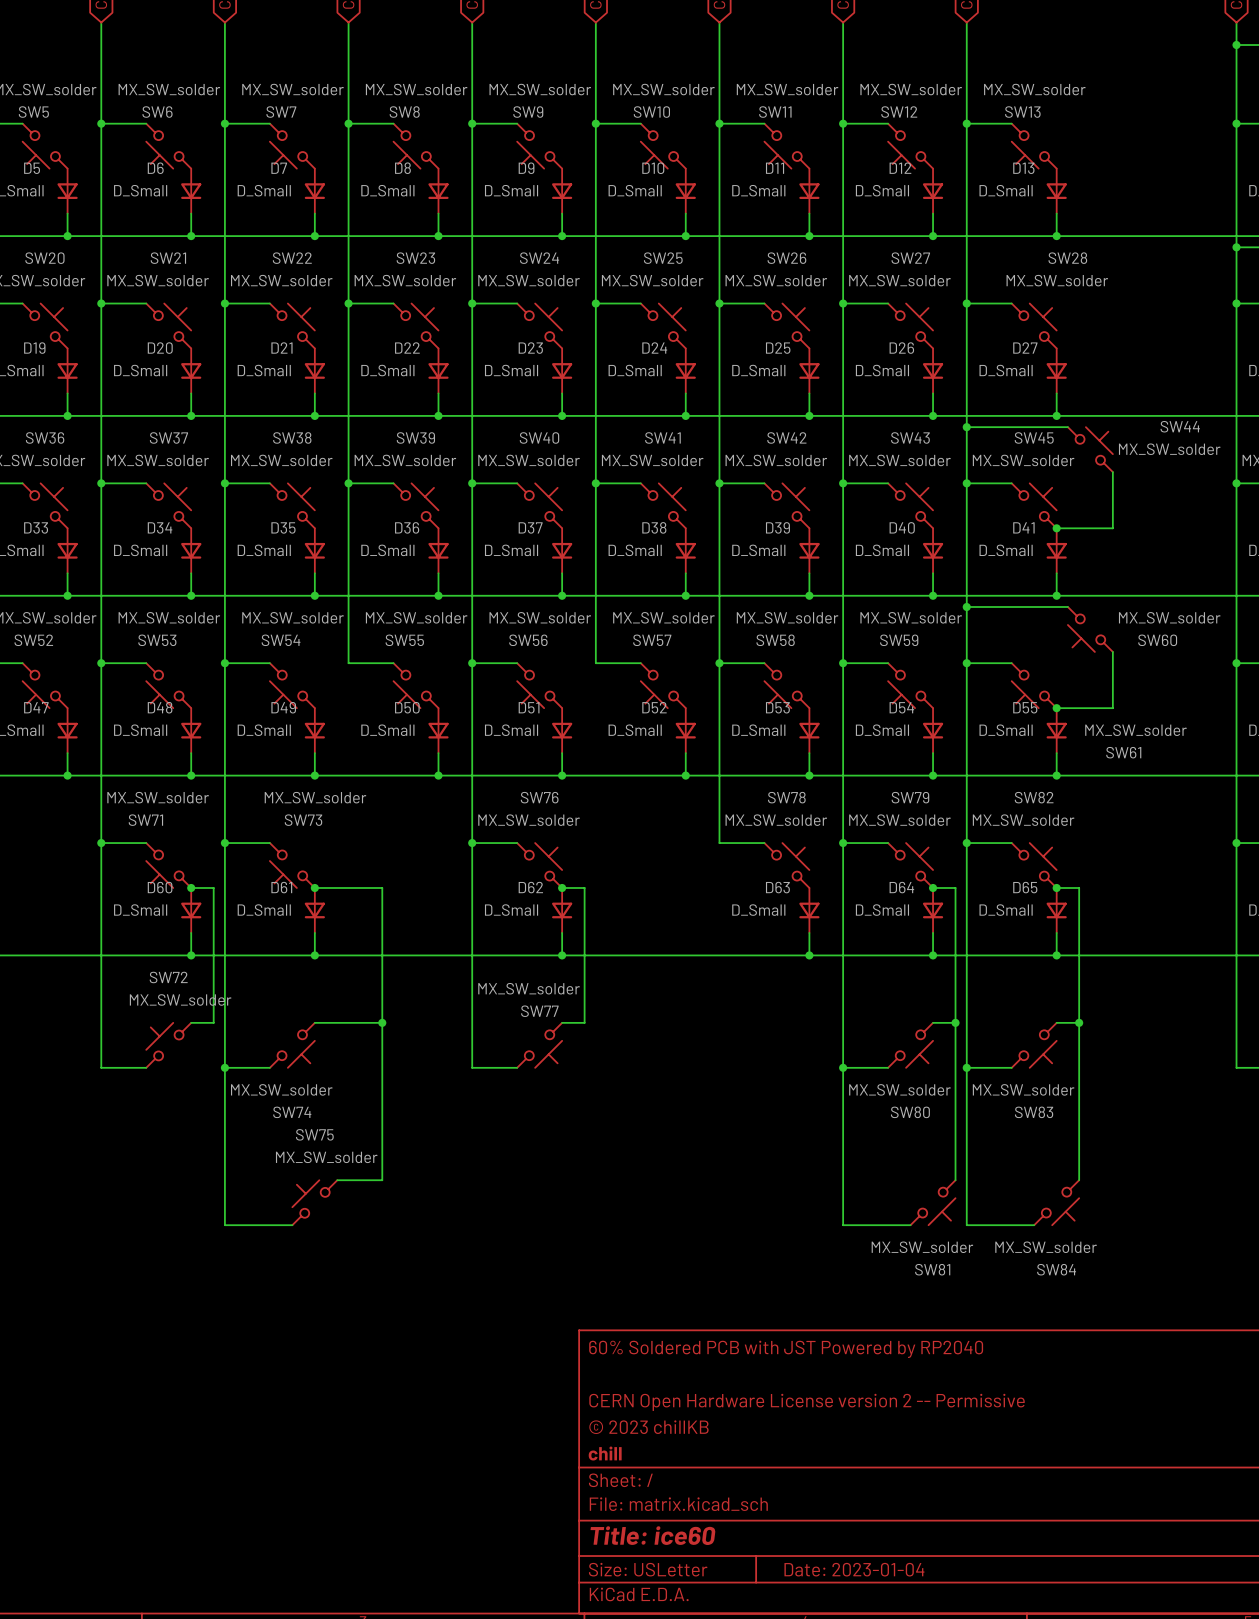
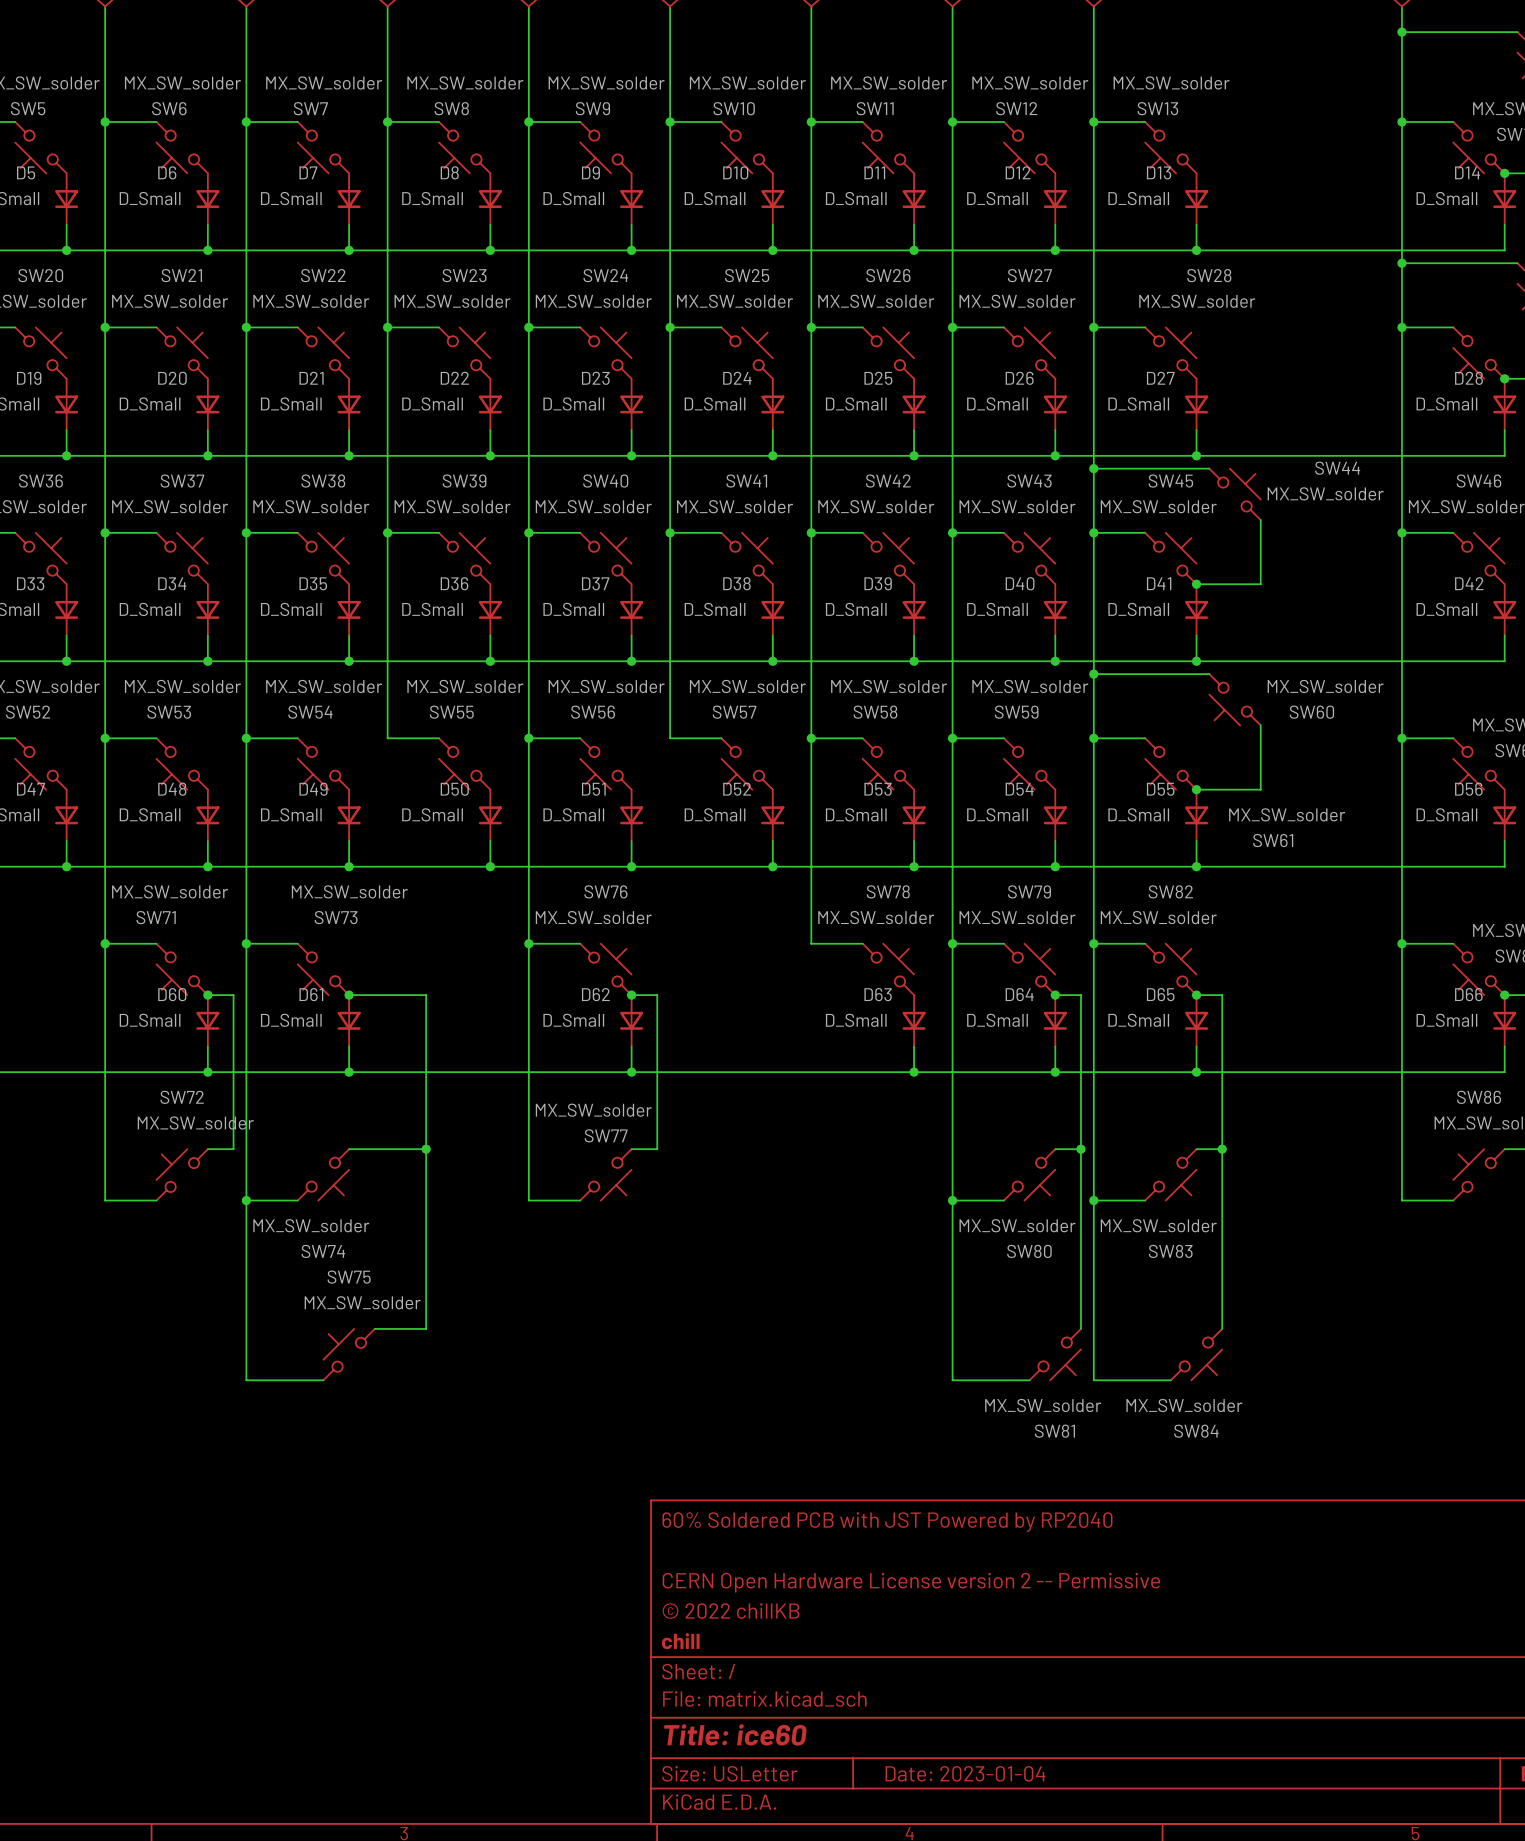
title block: © 2023 chillKB (648, 1427) -> © 2022 chillKB (731, 1611)

